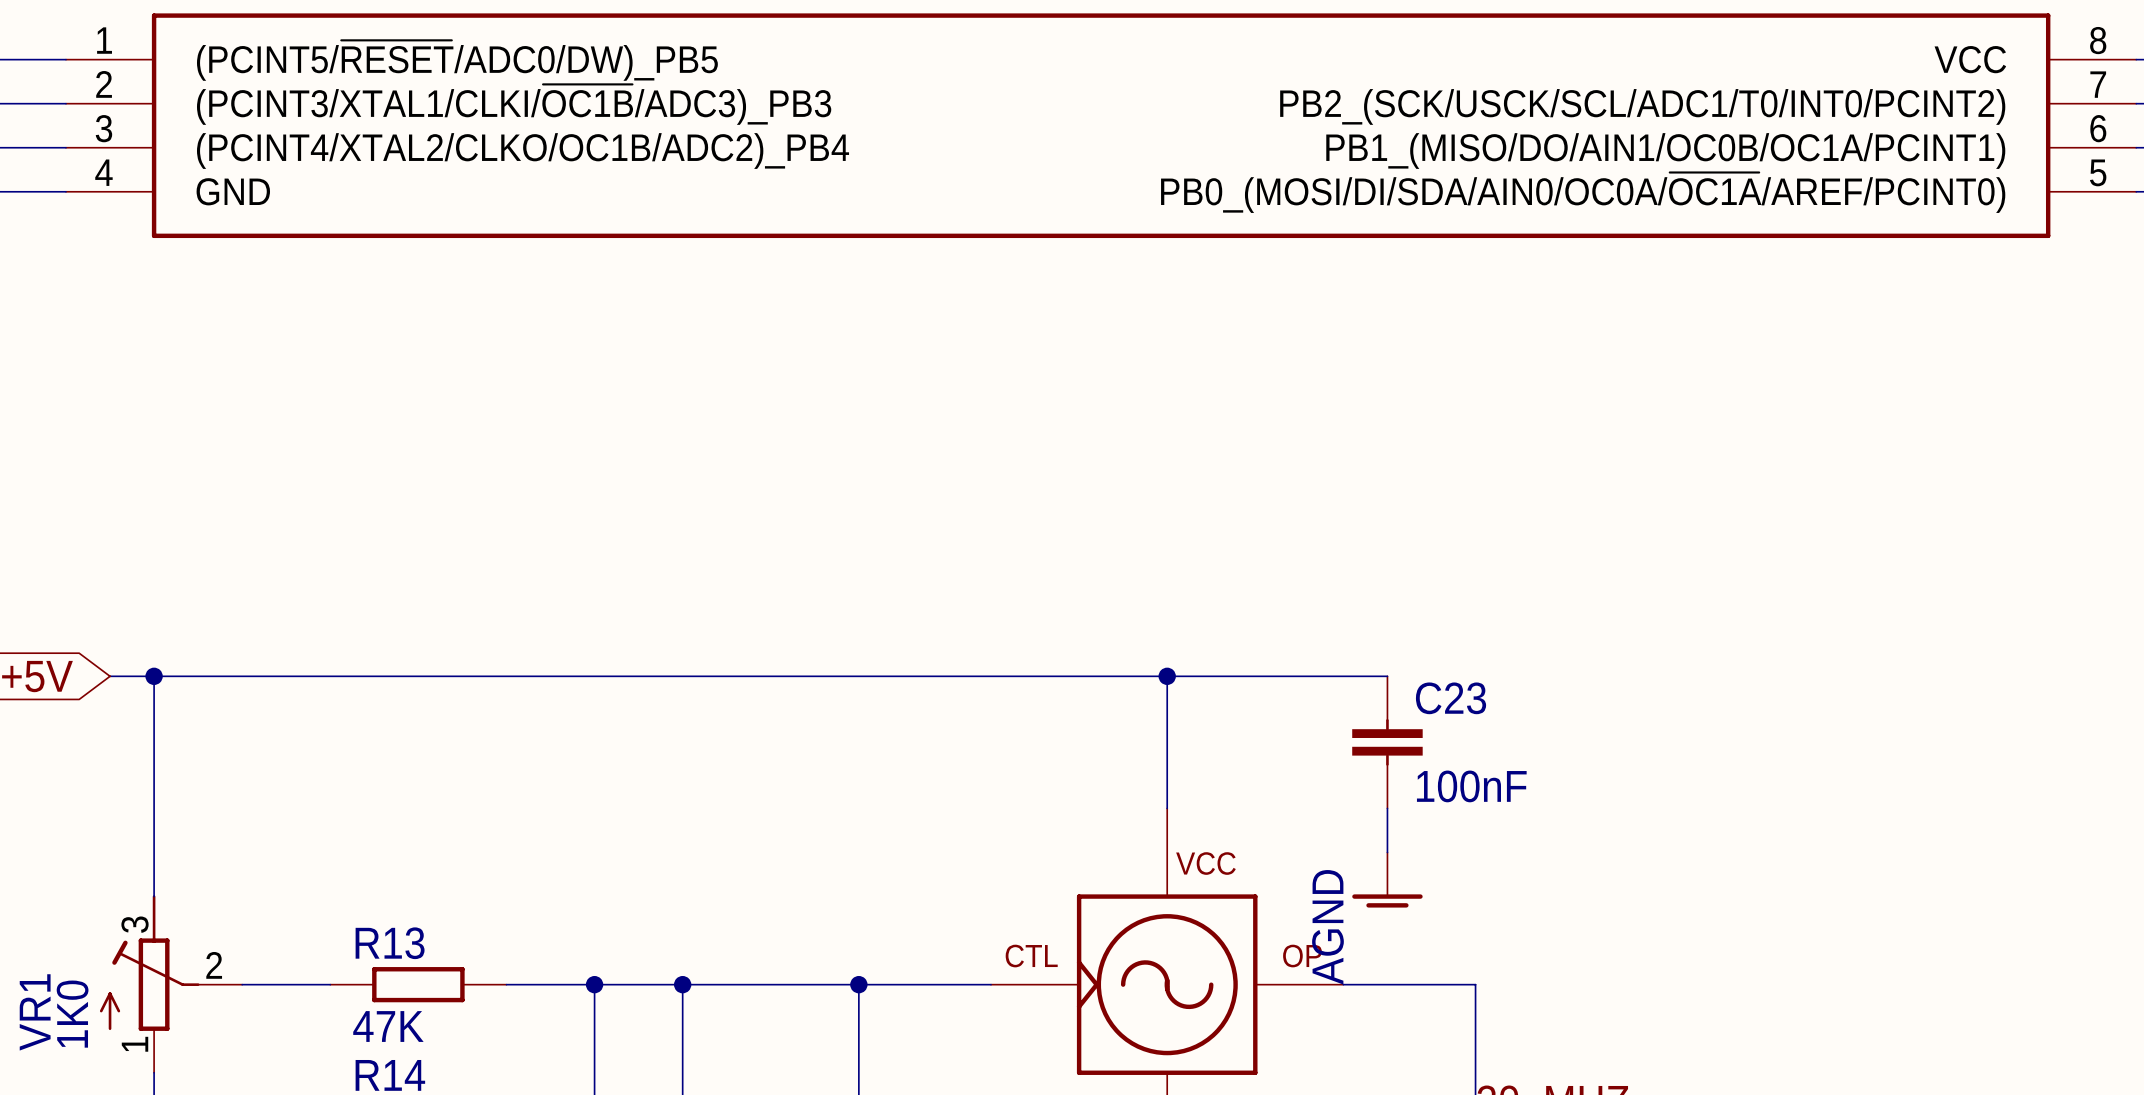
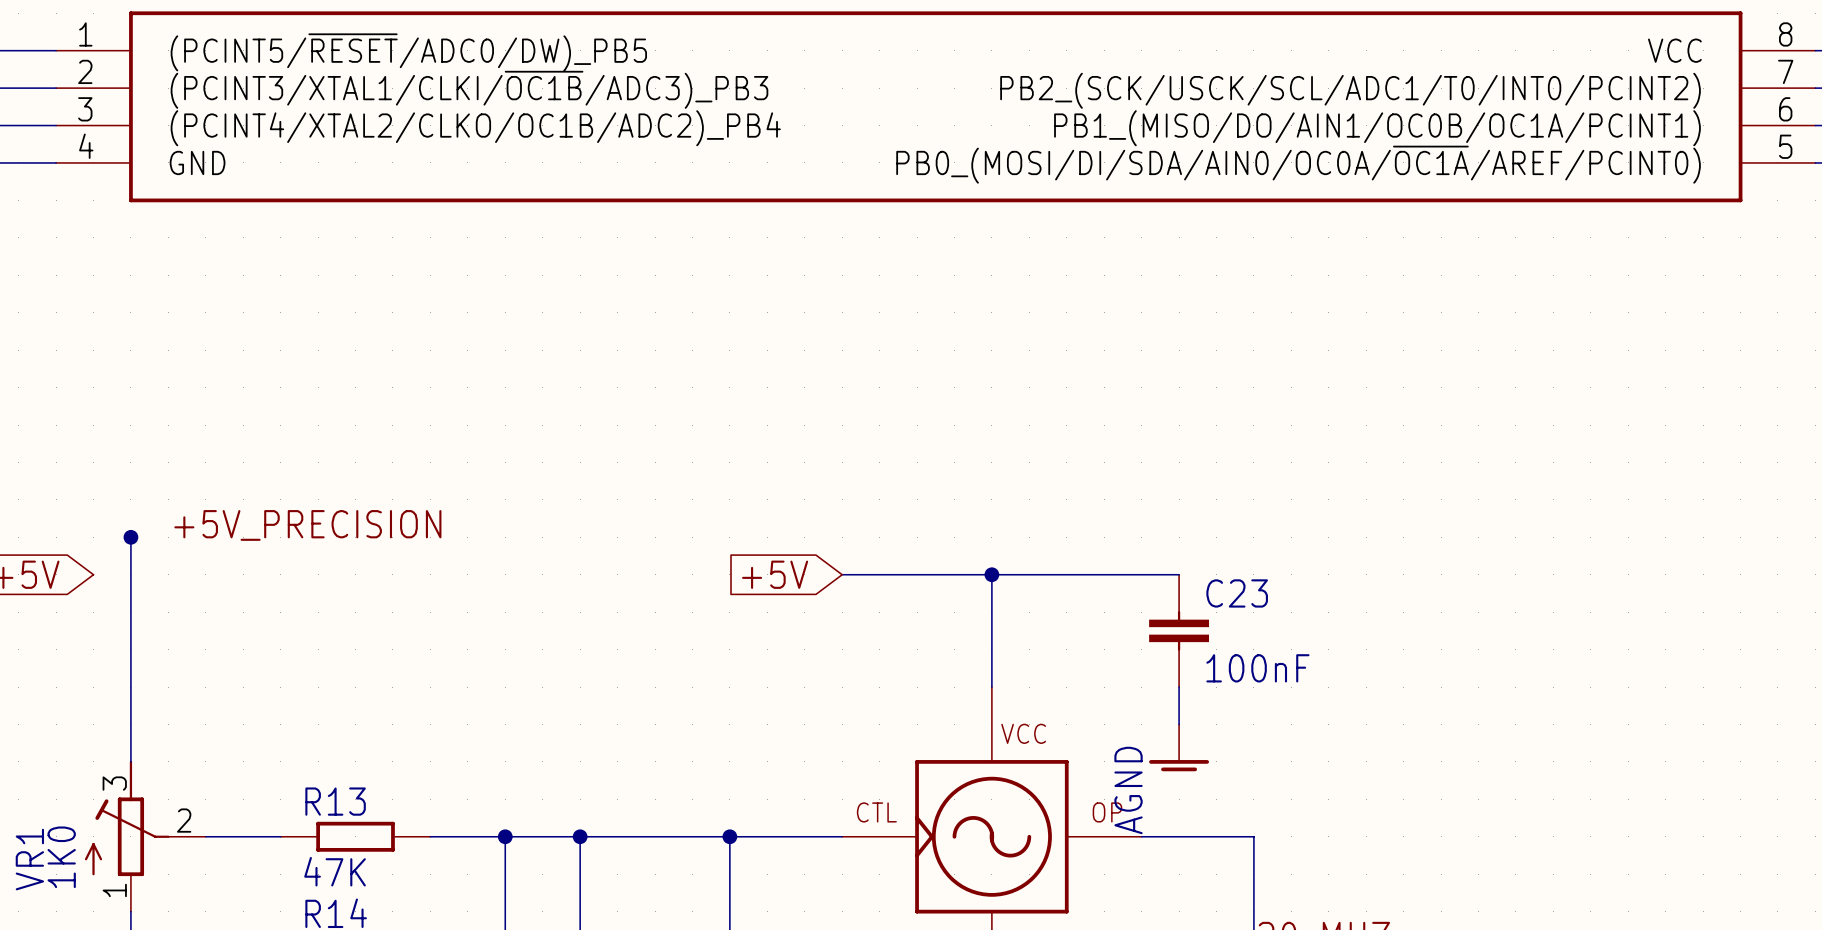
label: none -> +5V_PRECISION (307, 525)
wire: none -> (130, 537) (130, 574)
wire: (110, 676) (991, 676) -> none
junction position: (154, 676) -> (130, 537)
global label: none -> +5V (775, 574)

